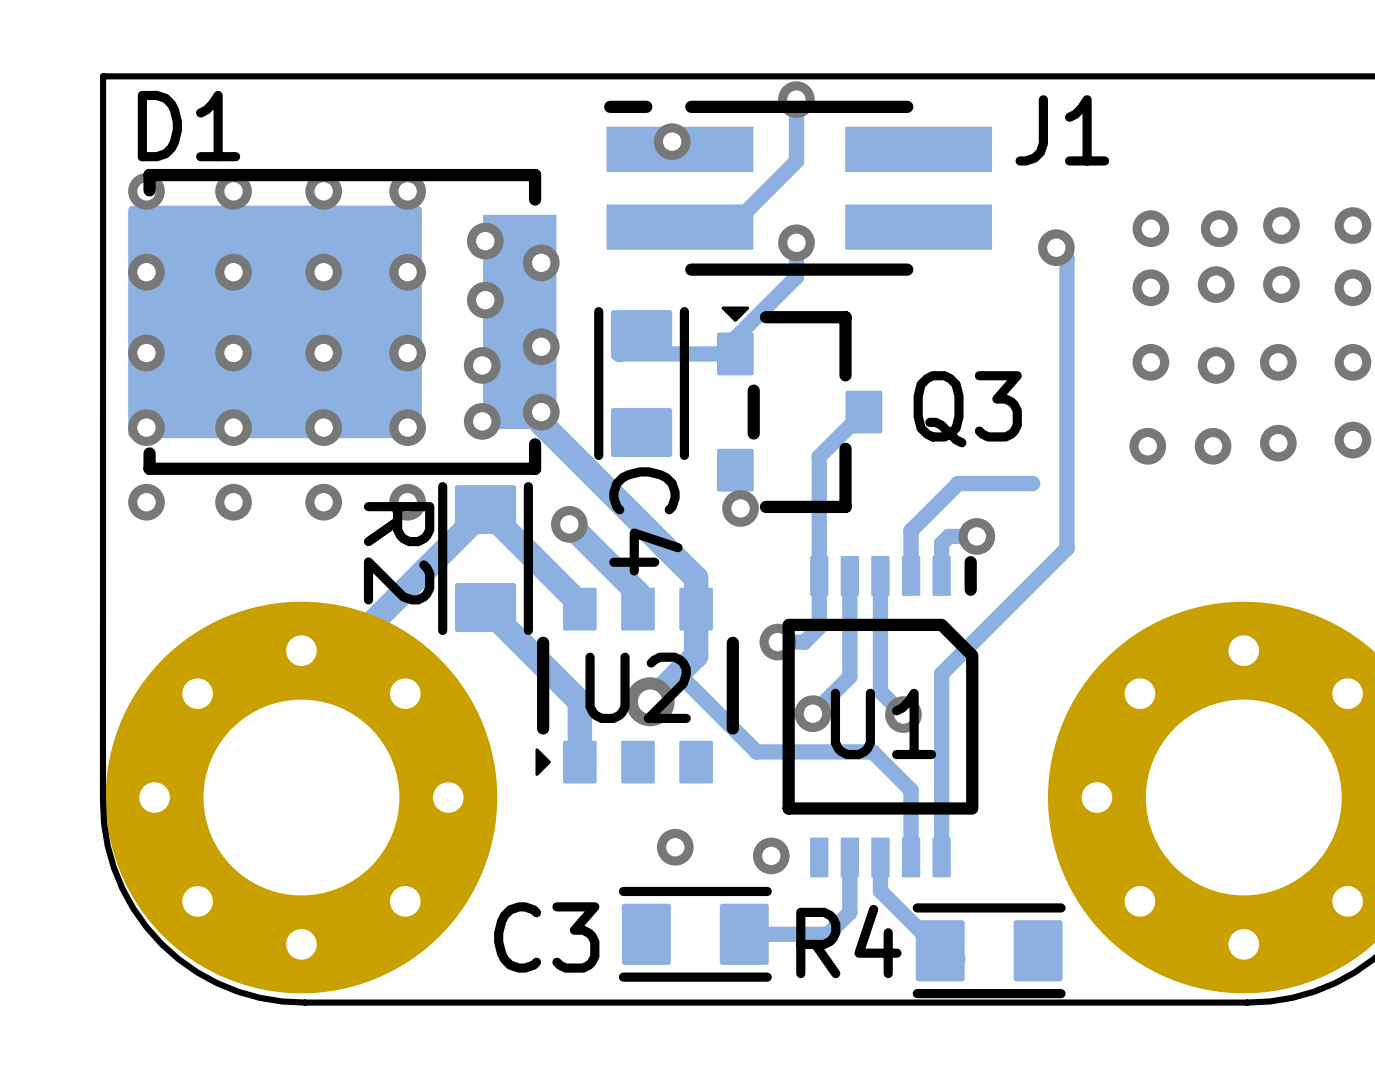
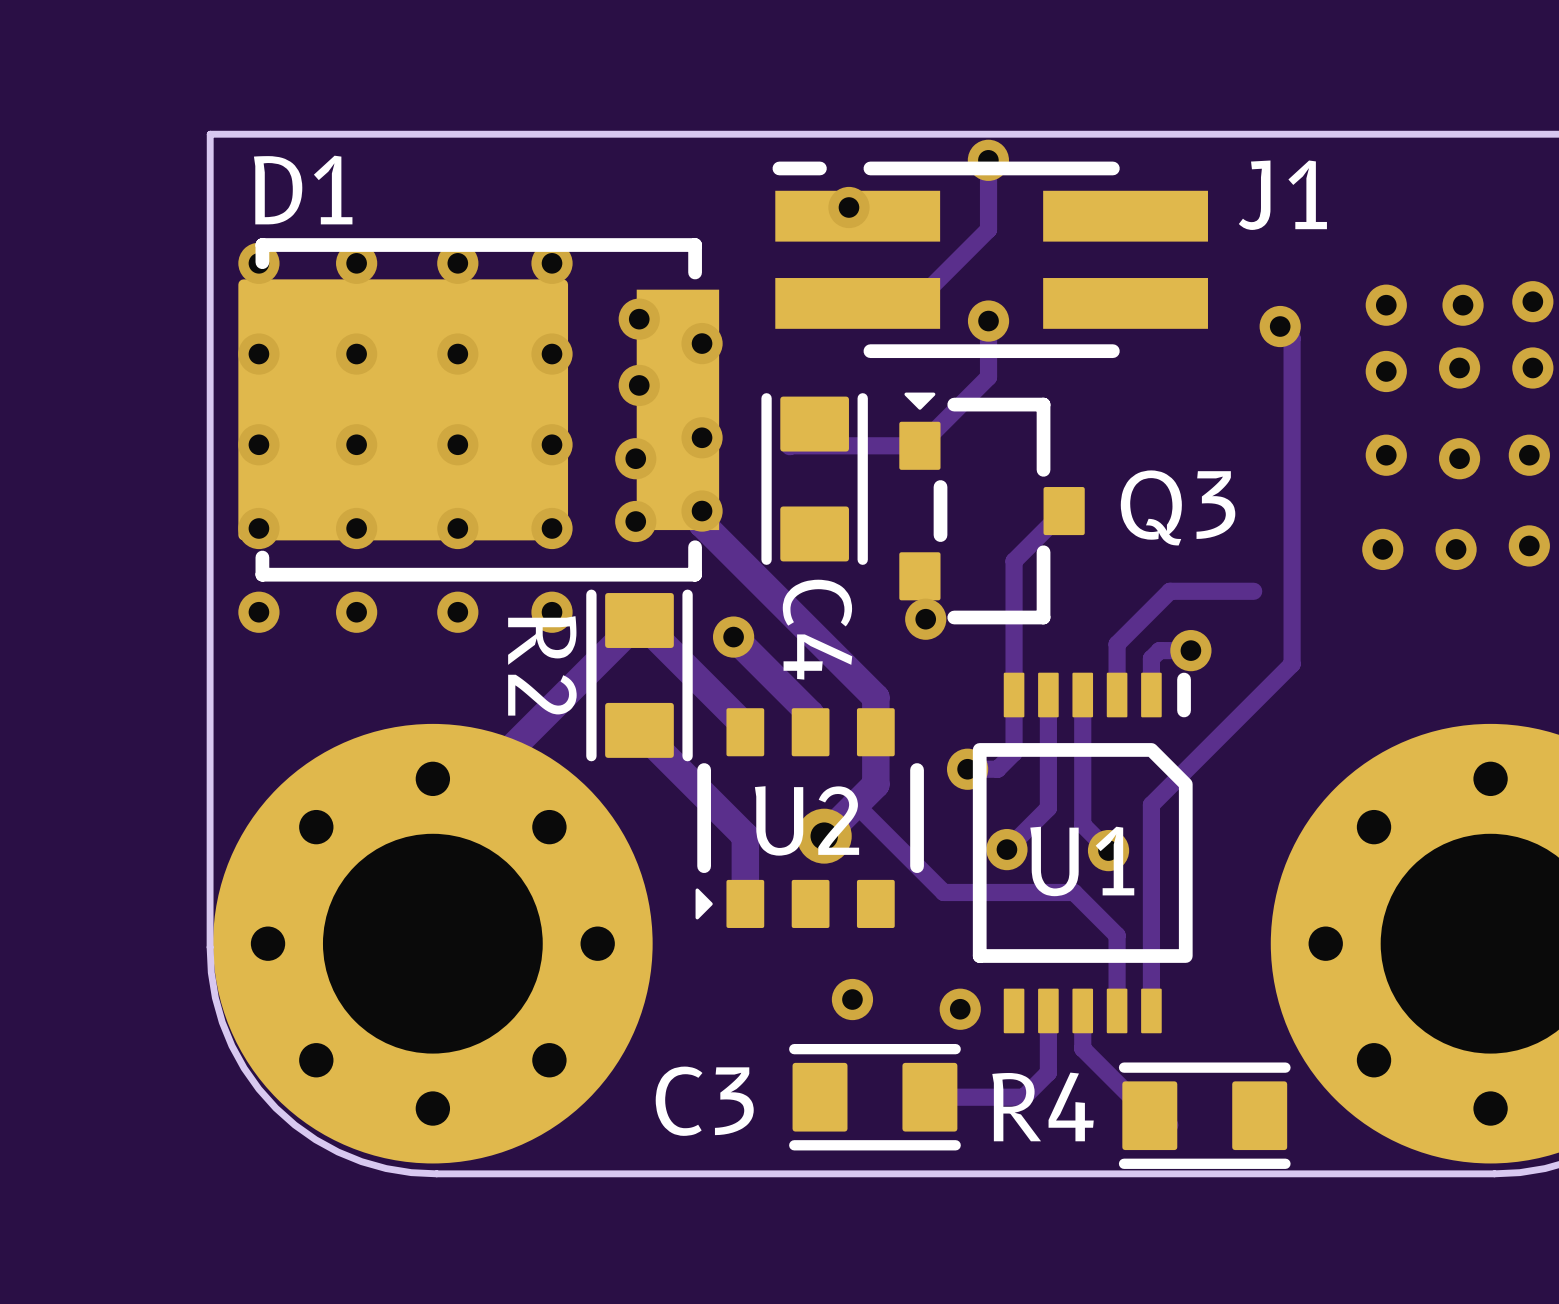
track: (796, 276) (719, 353) -> (988, 359) (988, 377) (919, 445)

